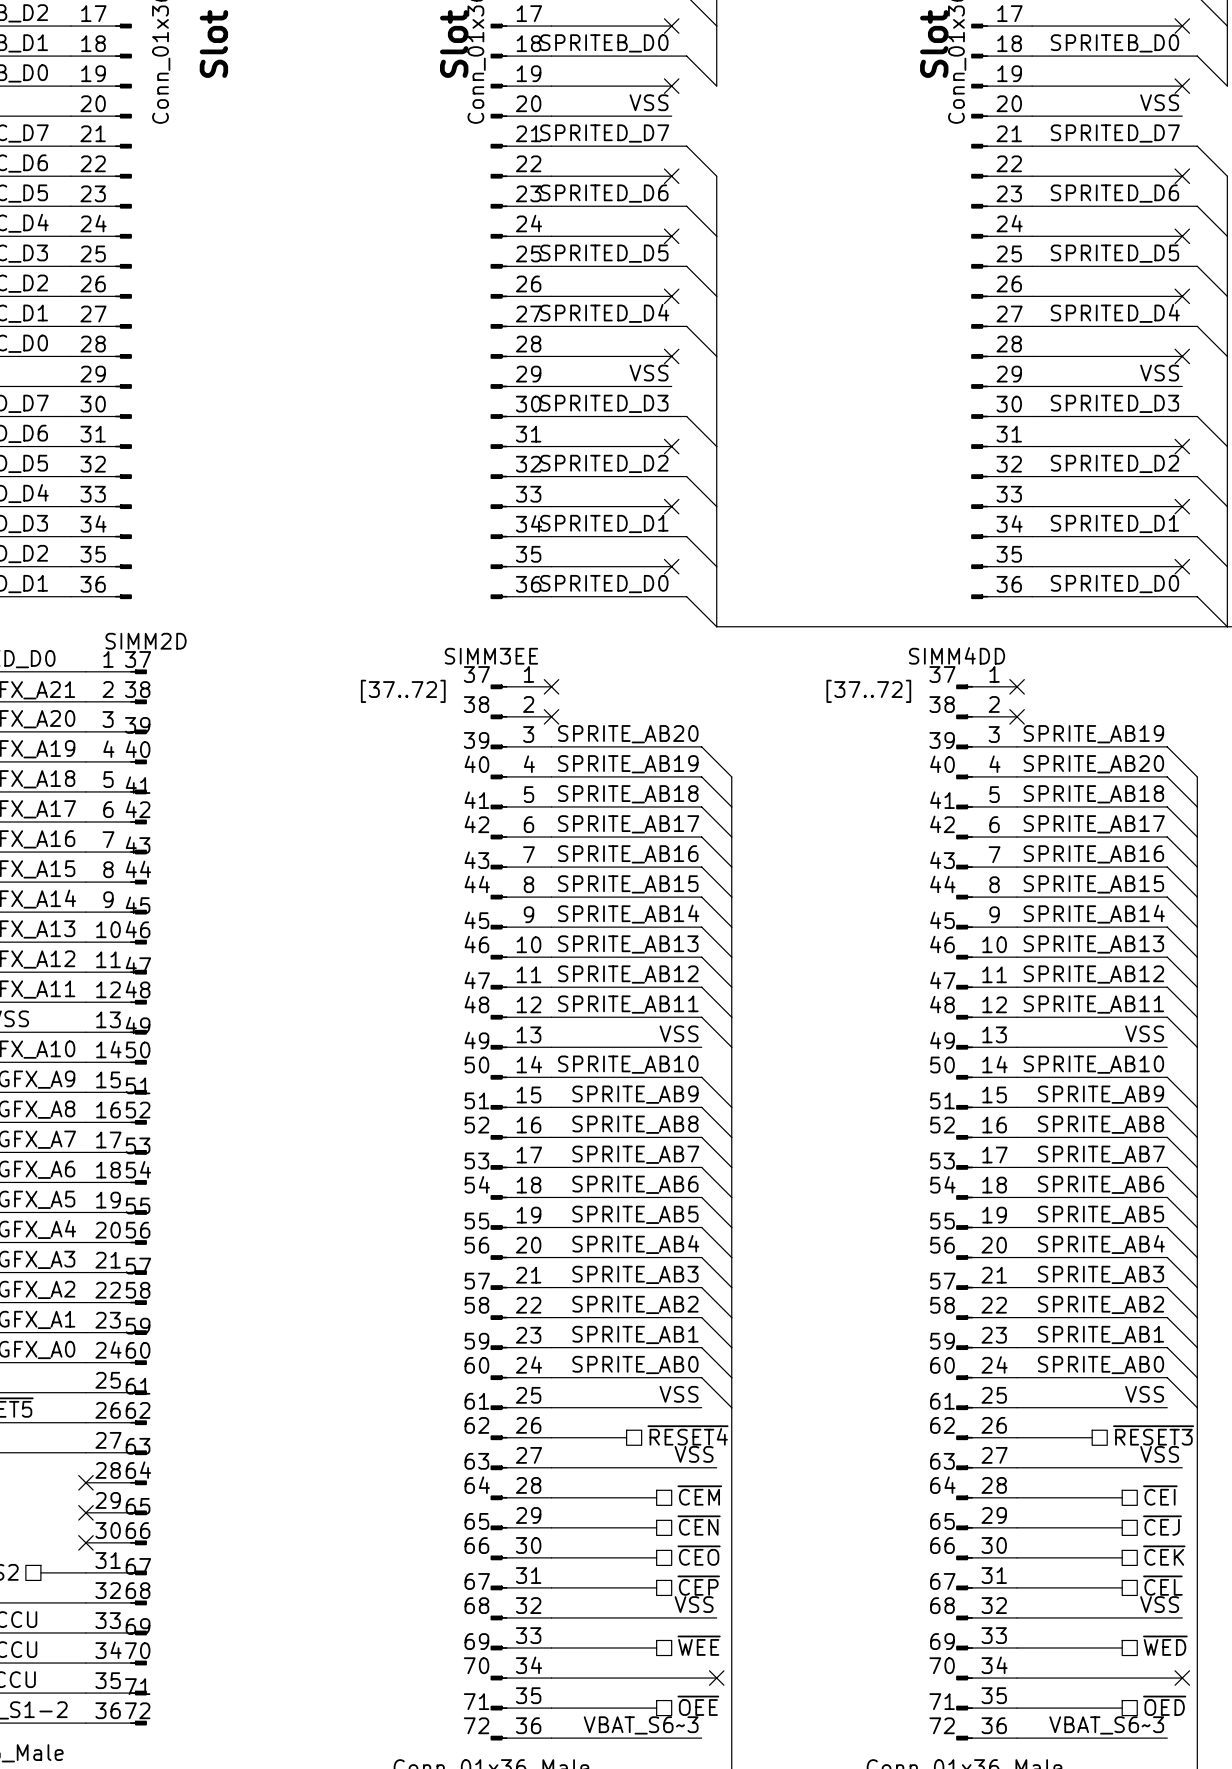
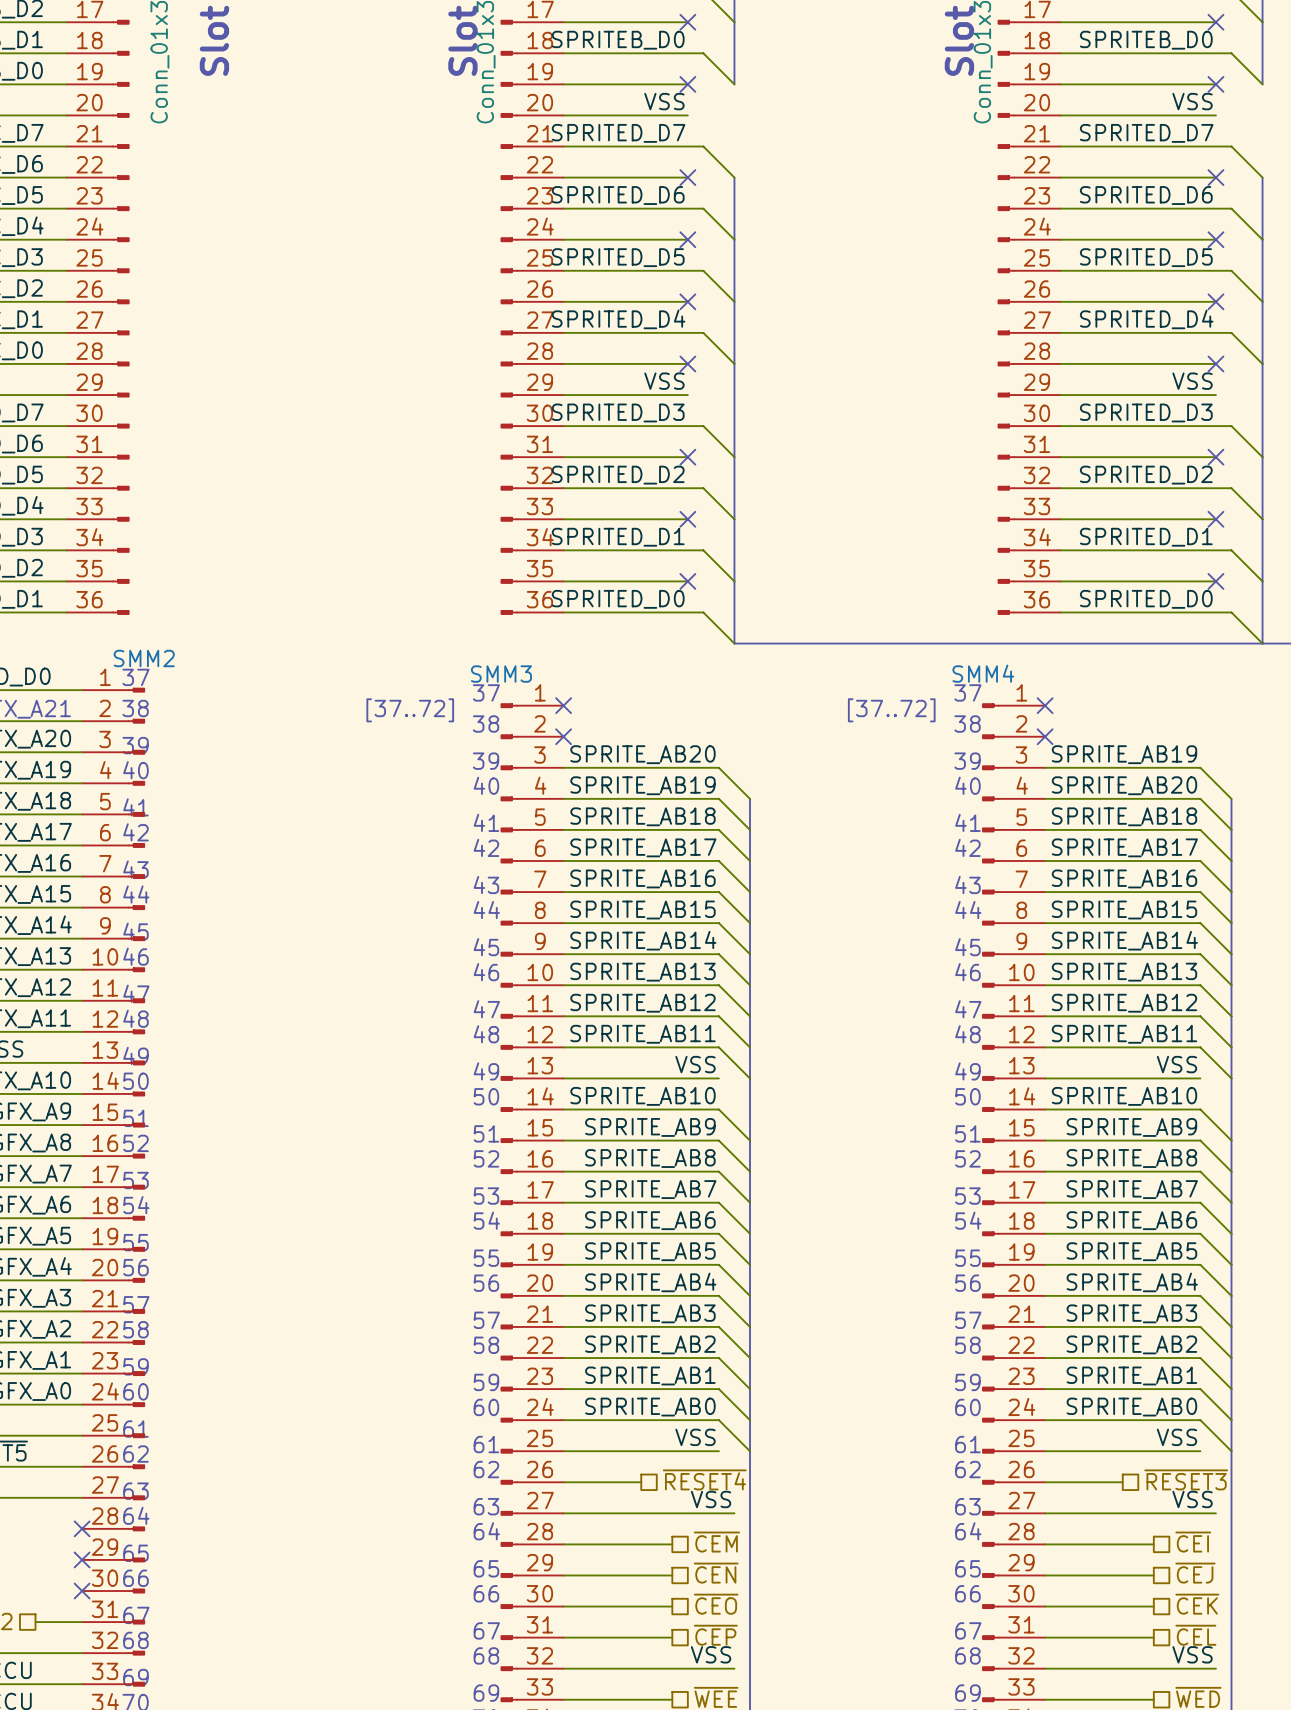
SIMM2D name: SIMM2D (146, 641) -> SMM2 (144, 658)
SIMM4DD name: SIMM4DD (957, 655) -> SMM4 (983, 673)
SIMM3EE name: SIMM3EE (491, 656) -> SMM3 (501, 674)

